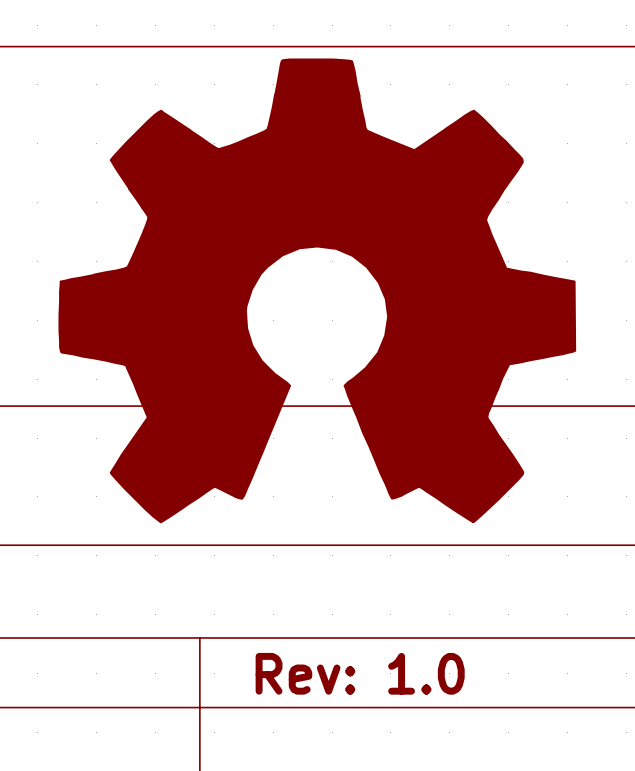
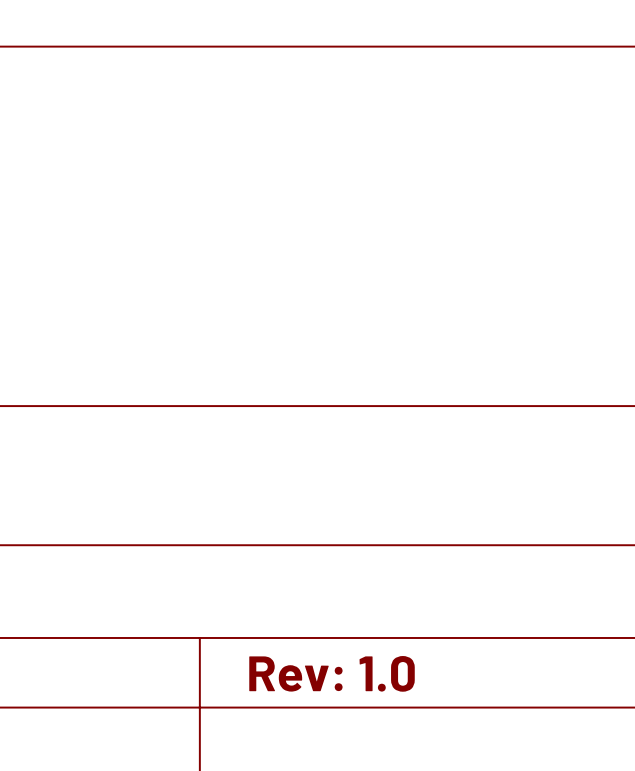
power symbol: (317, 290) -> none

